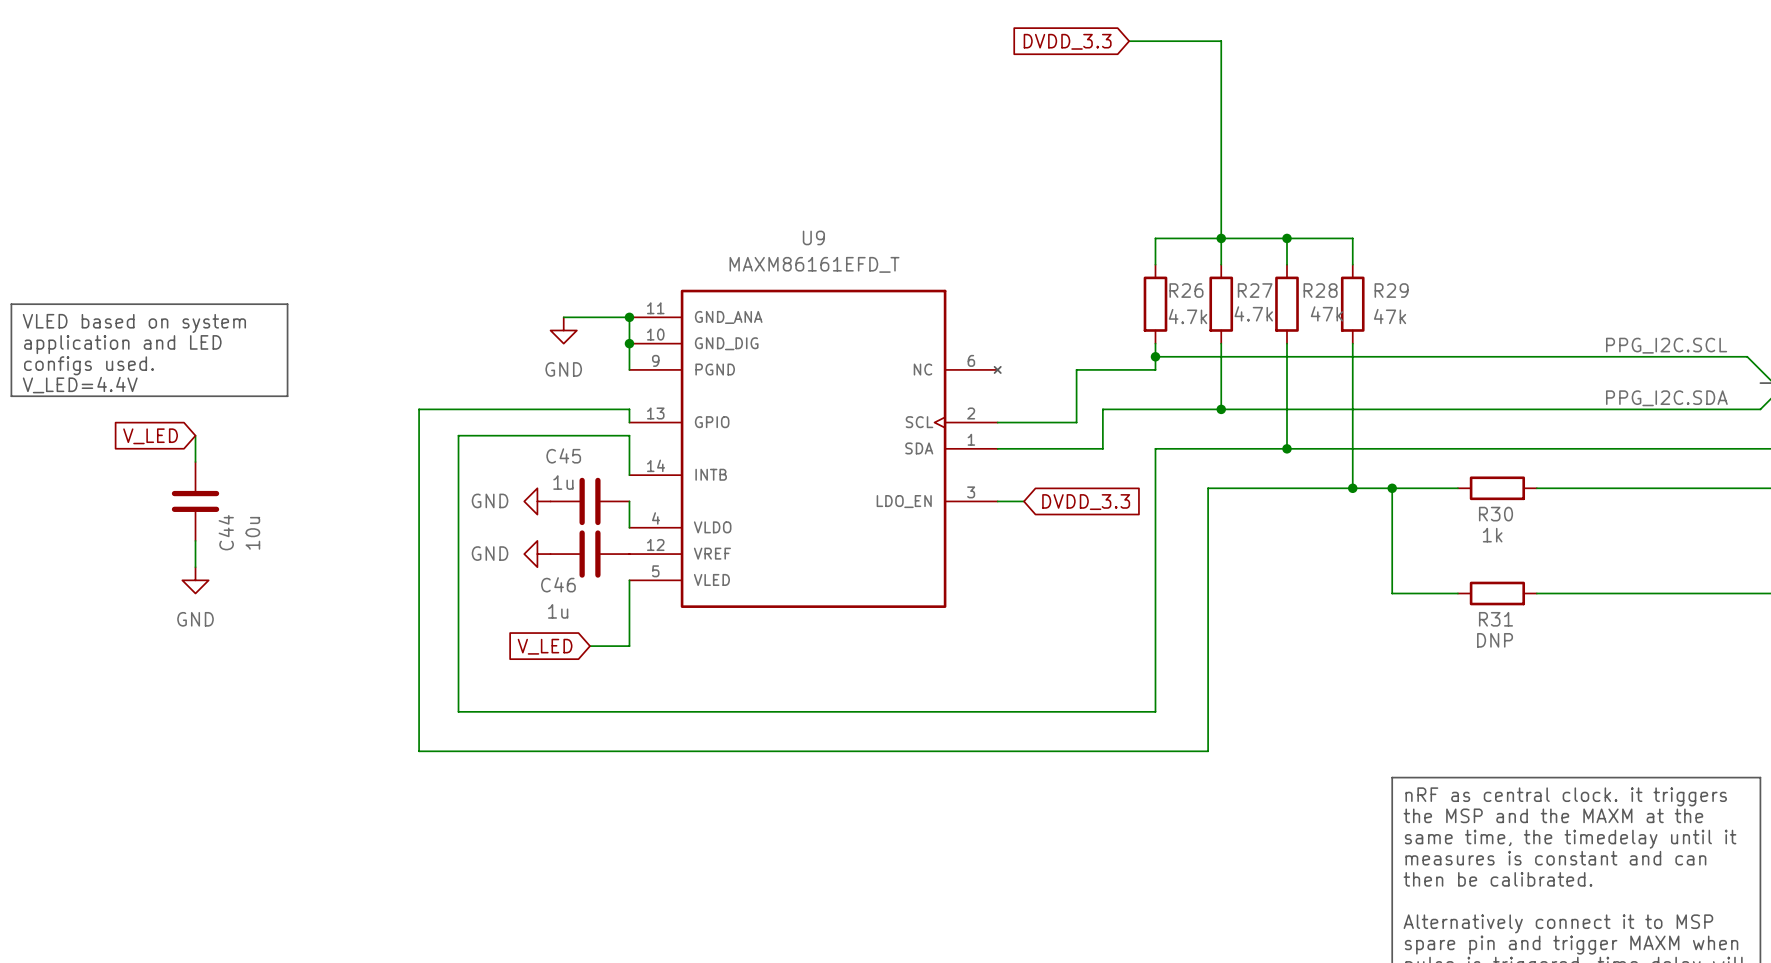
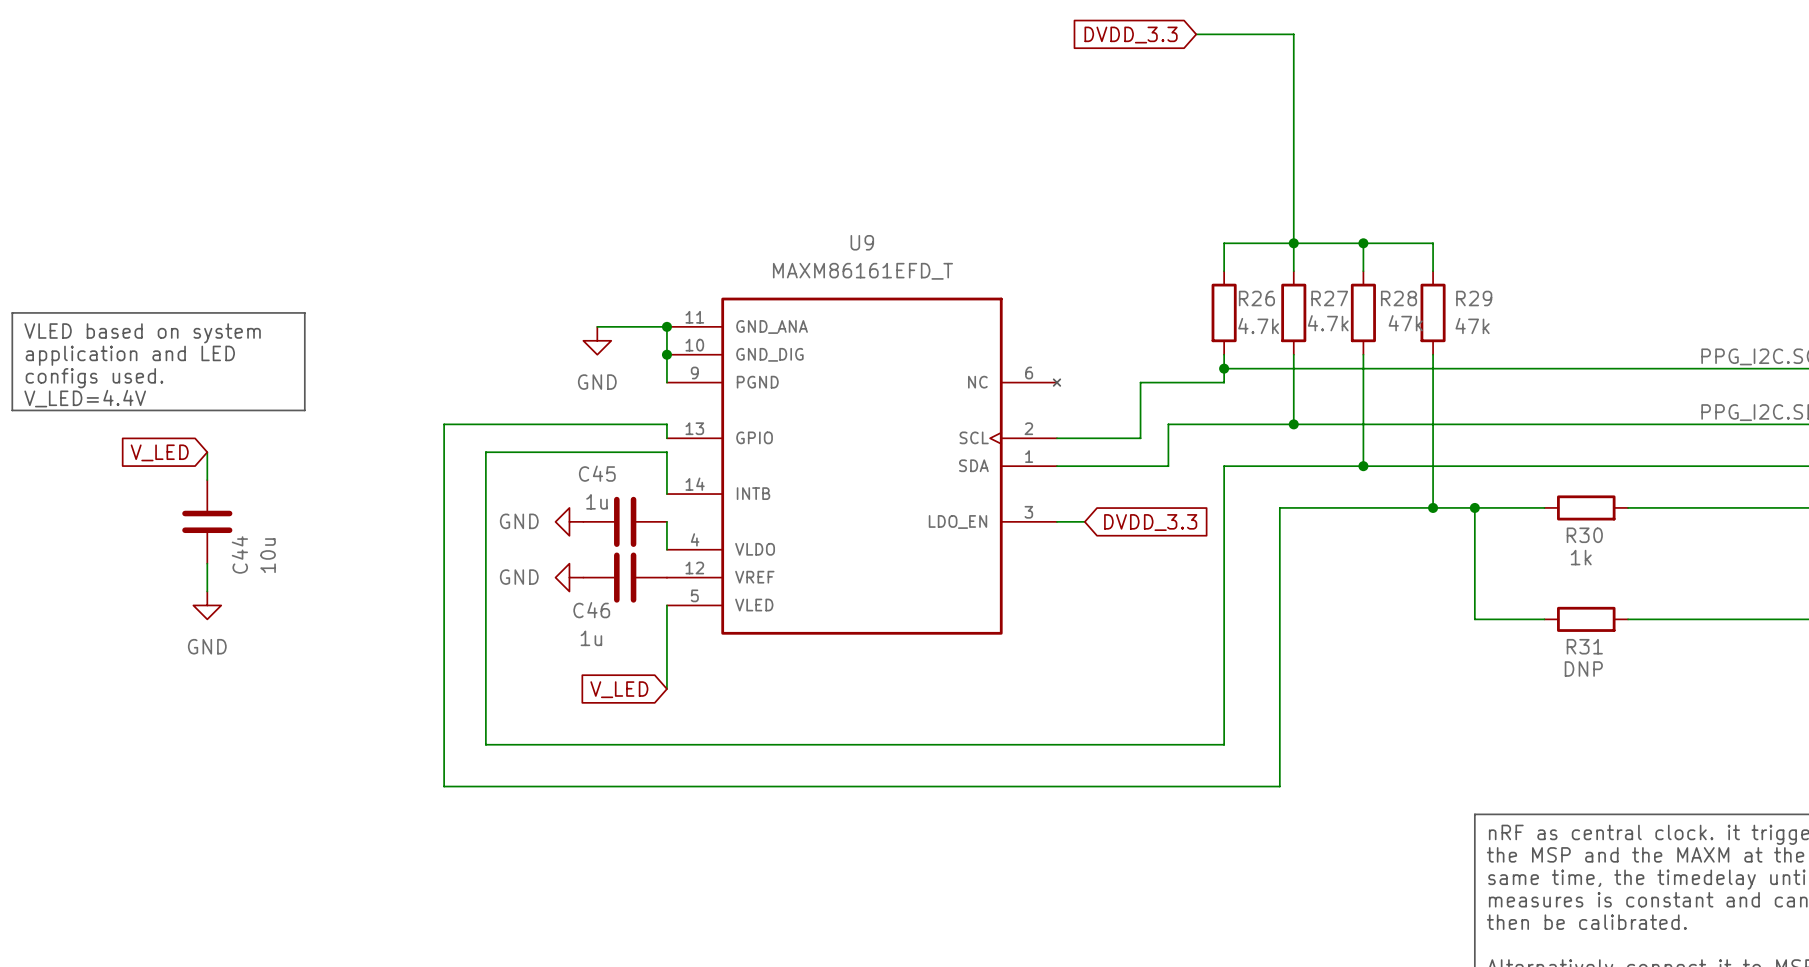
global label position: V_LED (545, 646) -> V_LED (619, 689)
wire: (590, 646) (629, 646) -> (666, 689) (666, 675)

